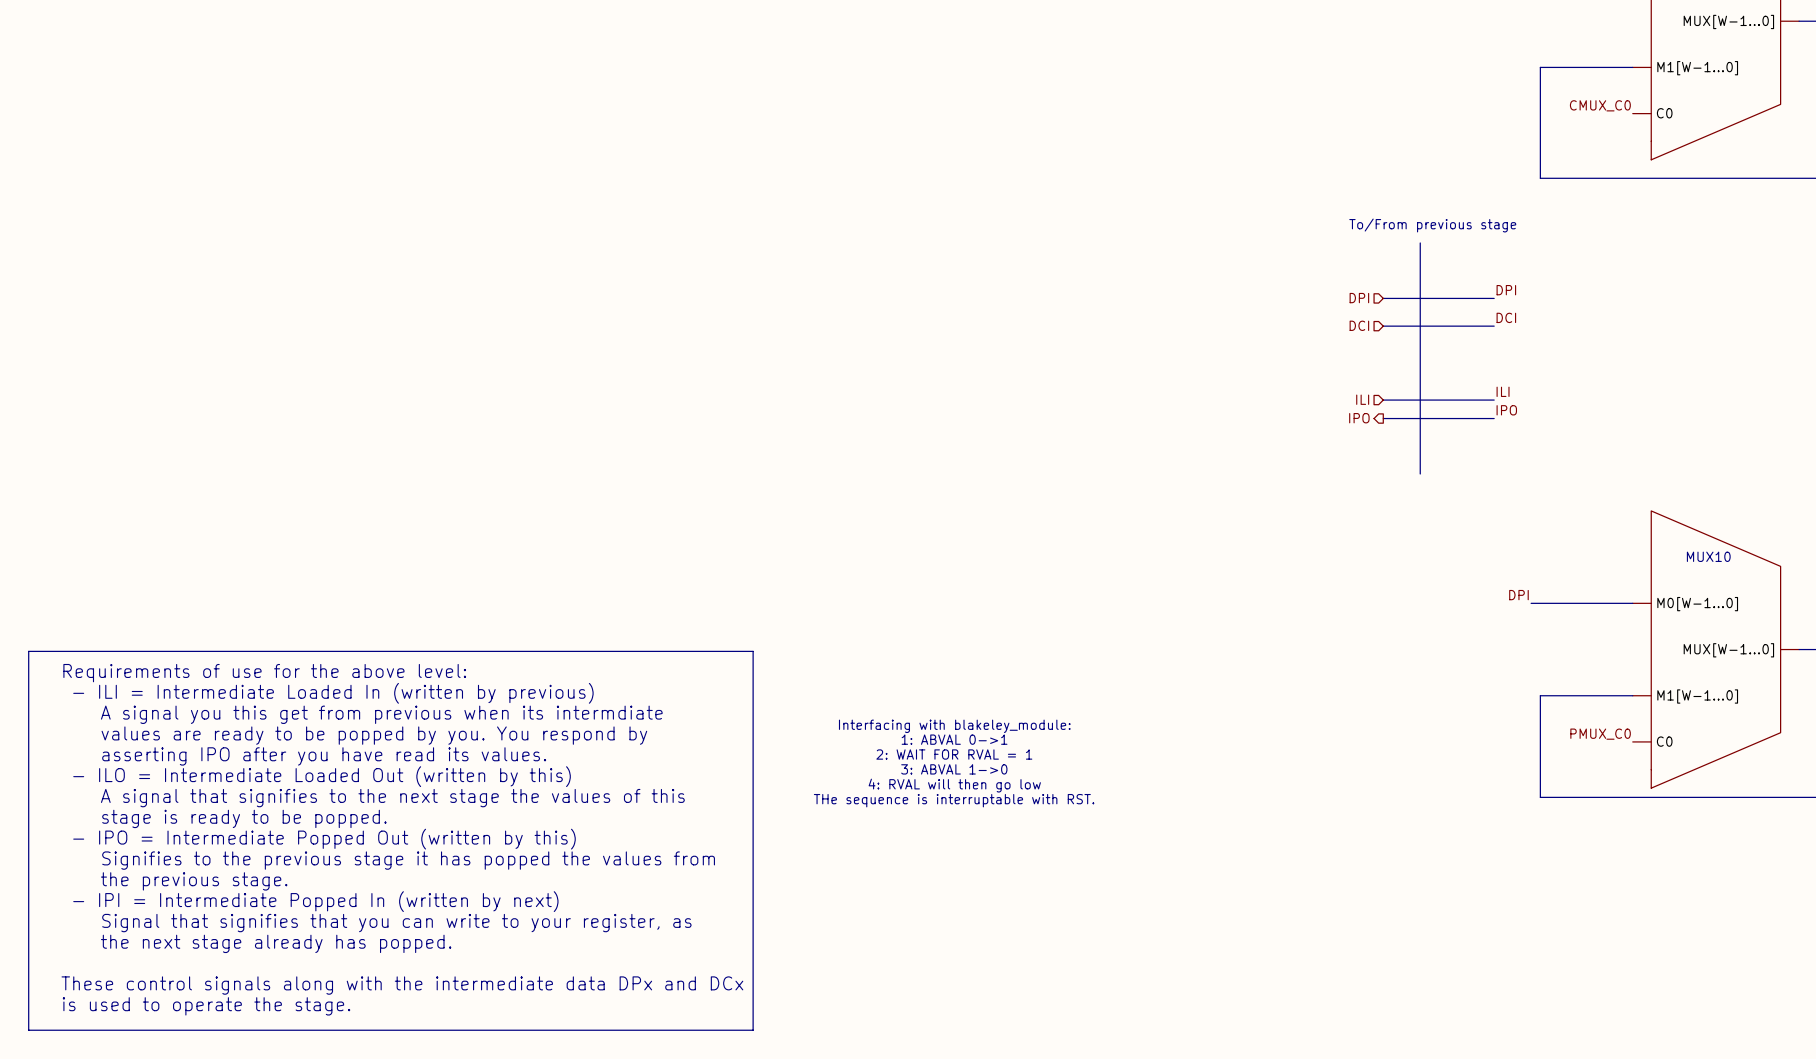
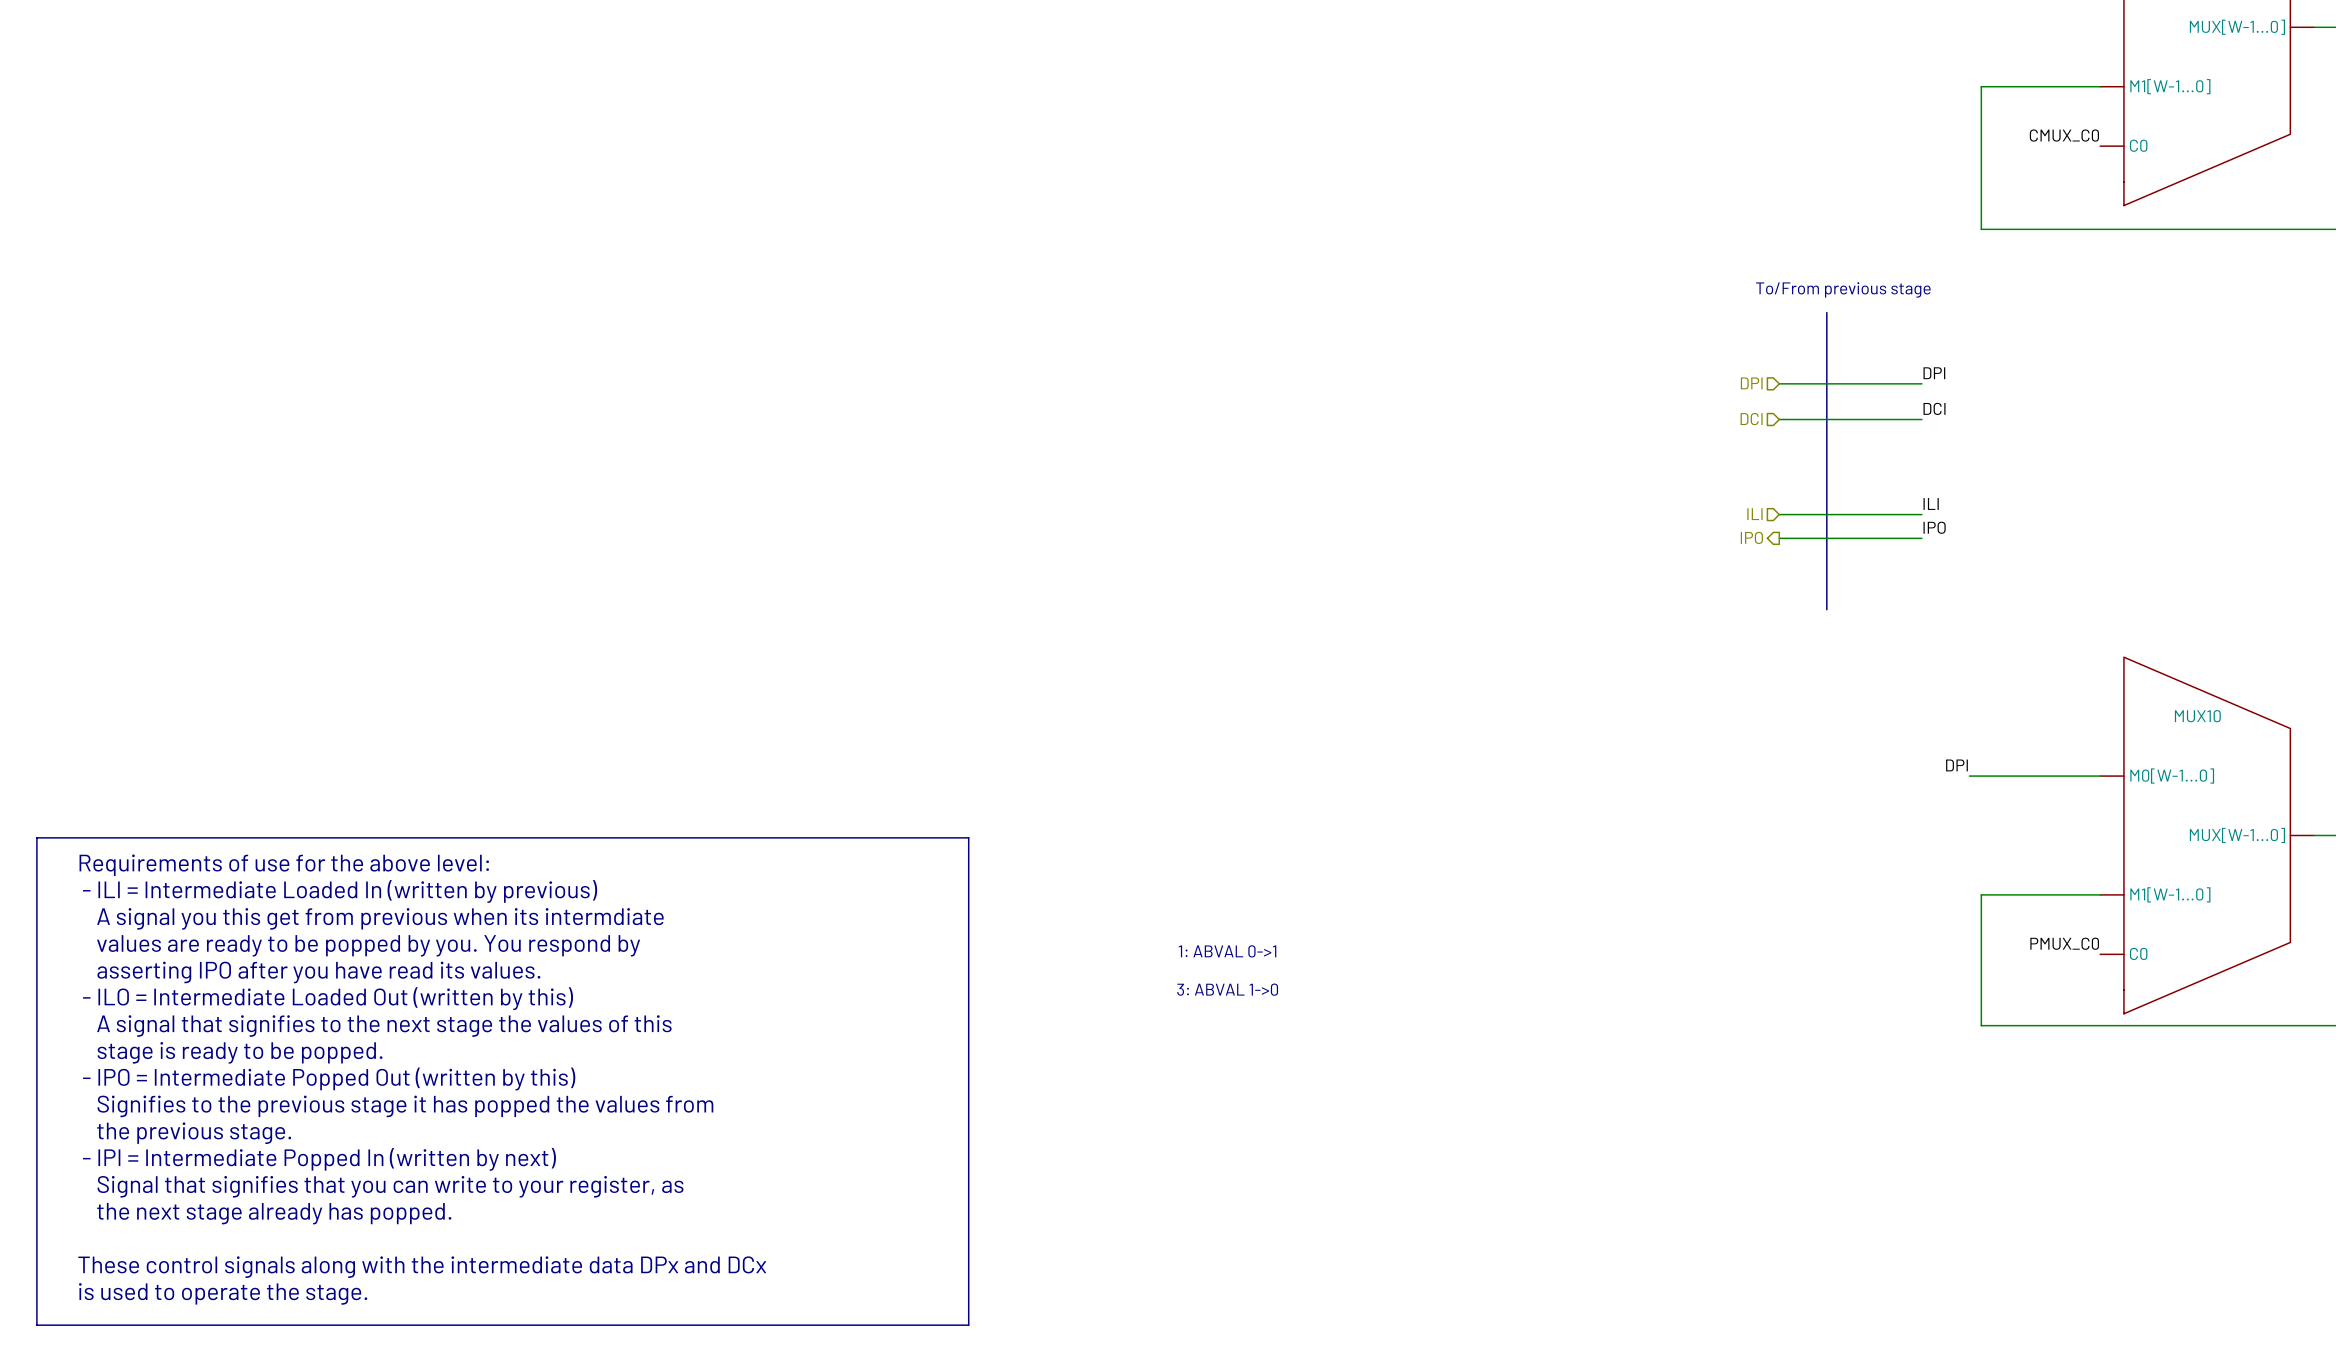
text: Interfacing with blakeley_module: (954, 726) -> none
text: 2: WAIT FOR RVAL = 1 (954, 754) -> none
text: 4: RVAL will then go low (954, 785) -> none
text: THe sequence is interruptable with RST. (954, 800) -> none

